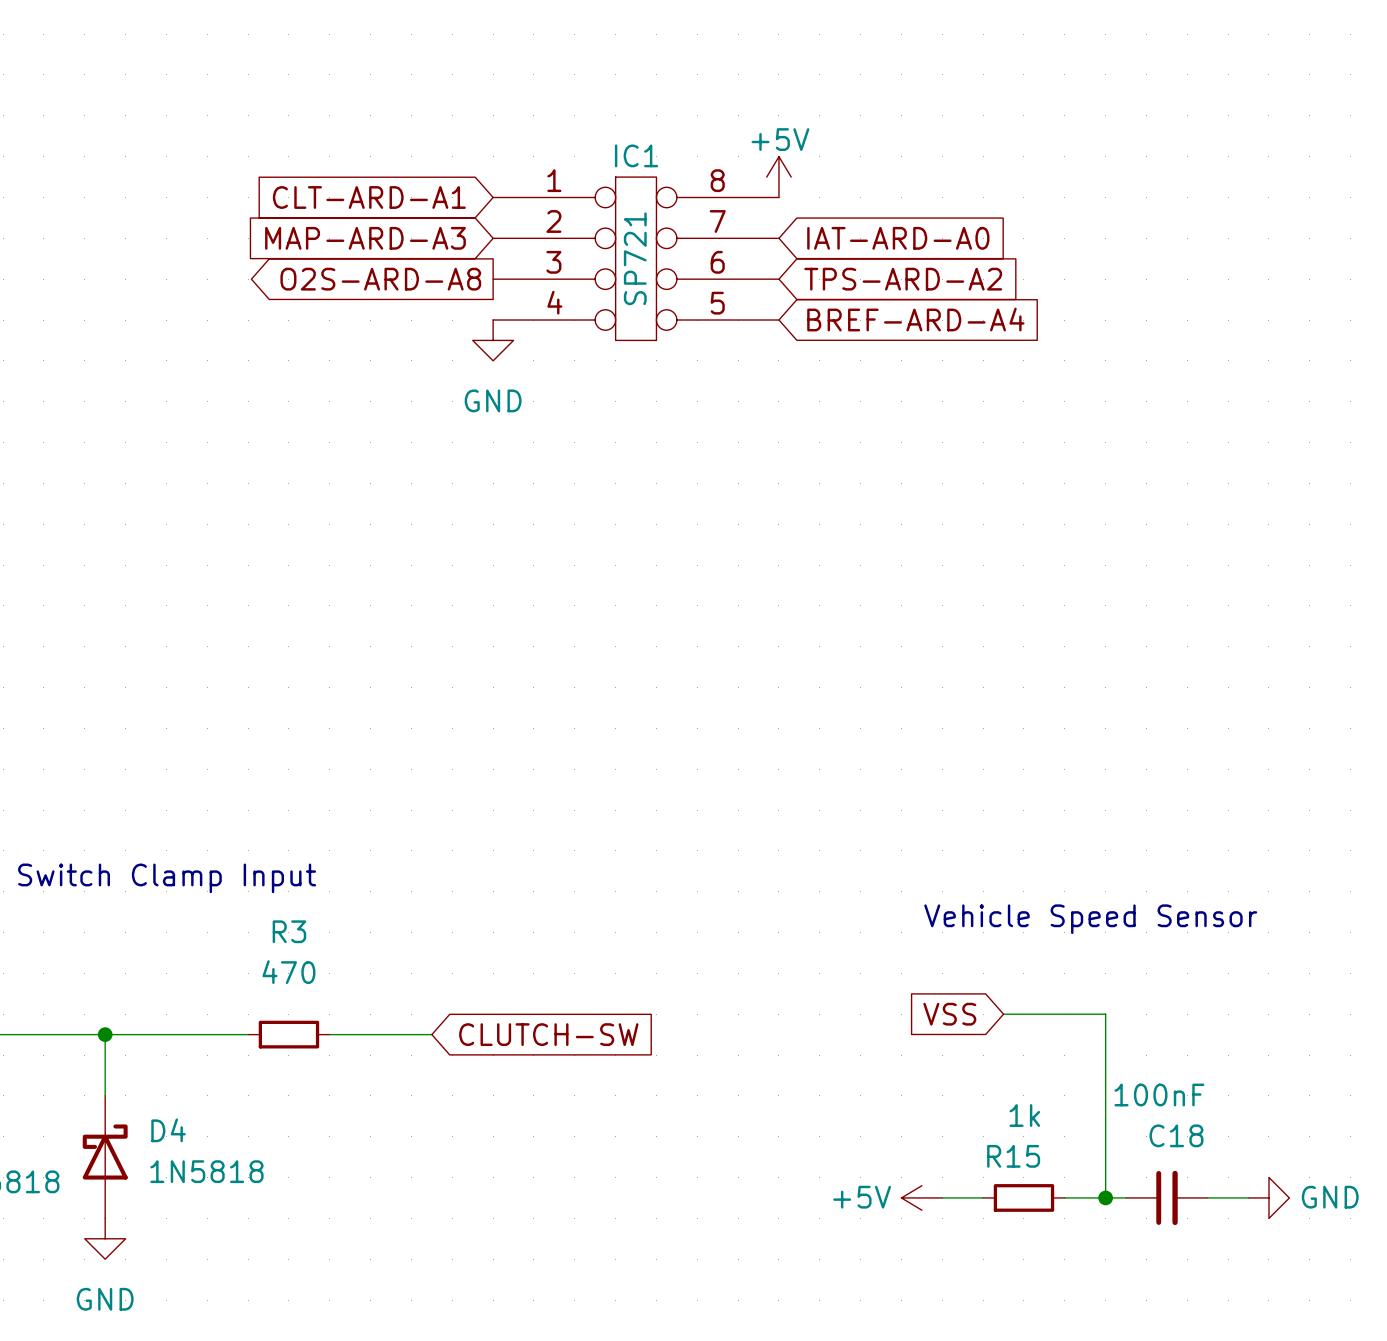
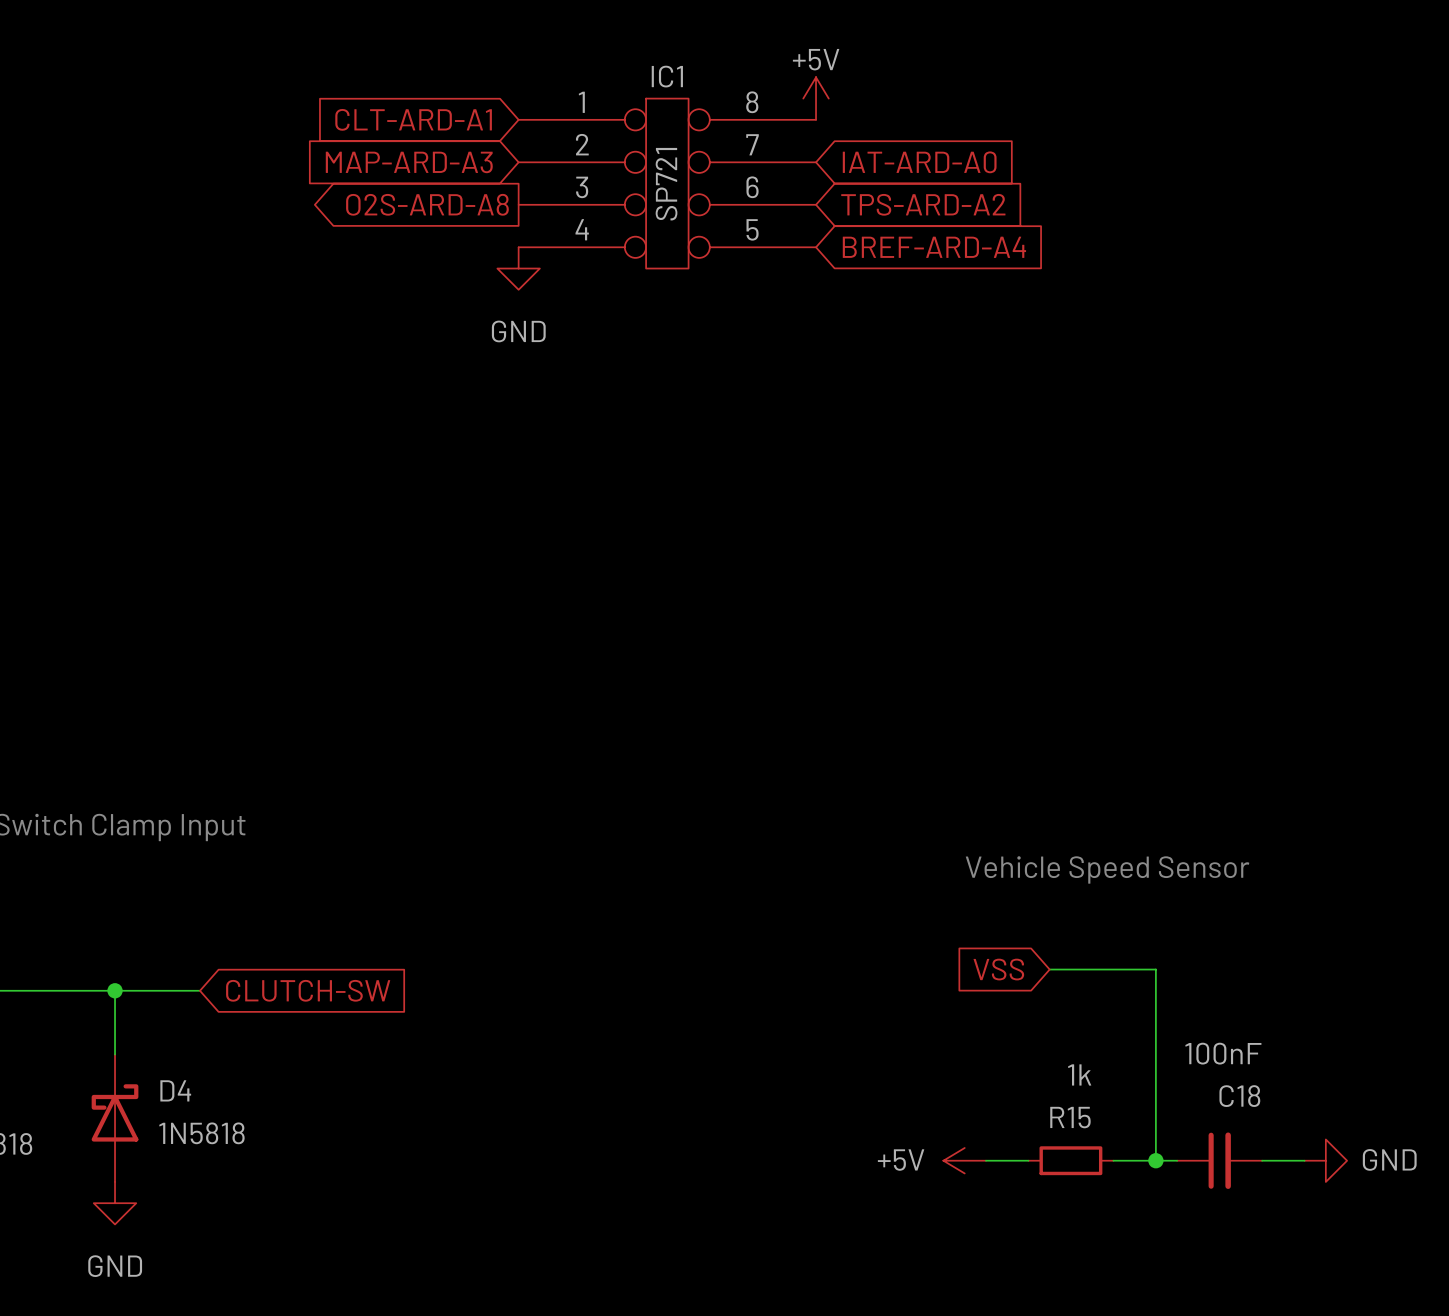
wire: (186, 1034) (248, 1034) -> none
R3: 470 (288, 1034) -> none
wire: (329, 1034) (431, 1034) -> none
global label position: CLUTCH-SW (548, 1034) -> CLUTCH-SW (308, 990)

